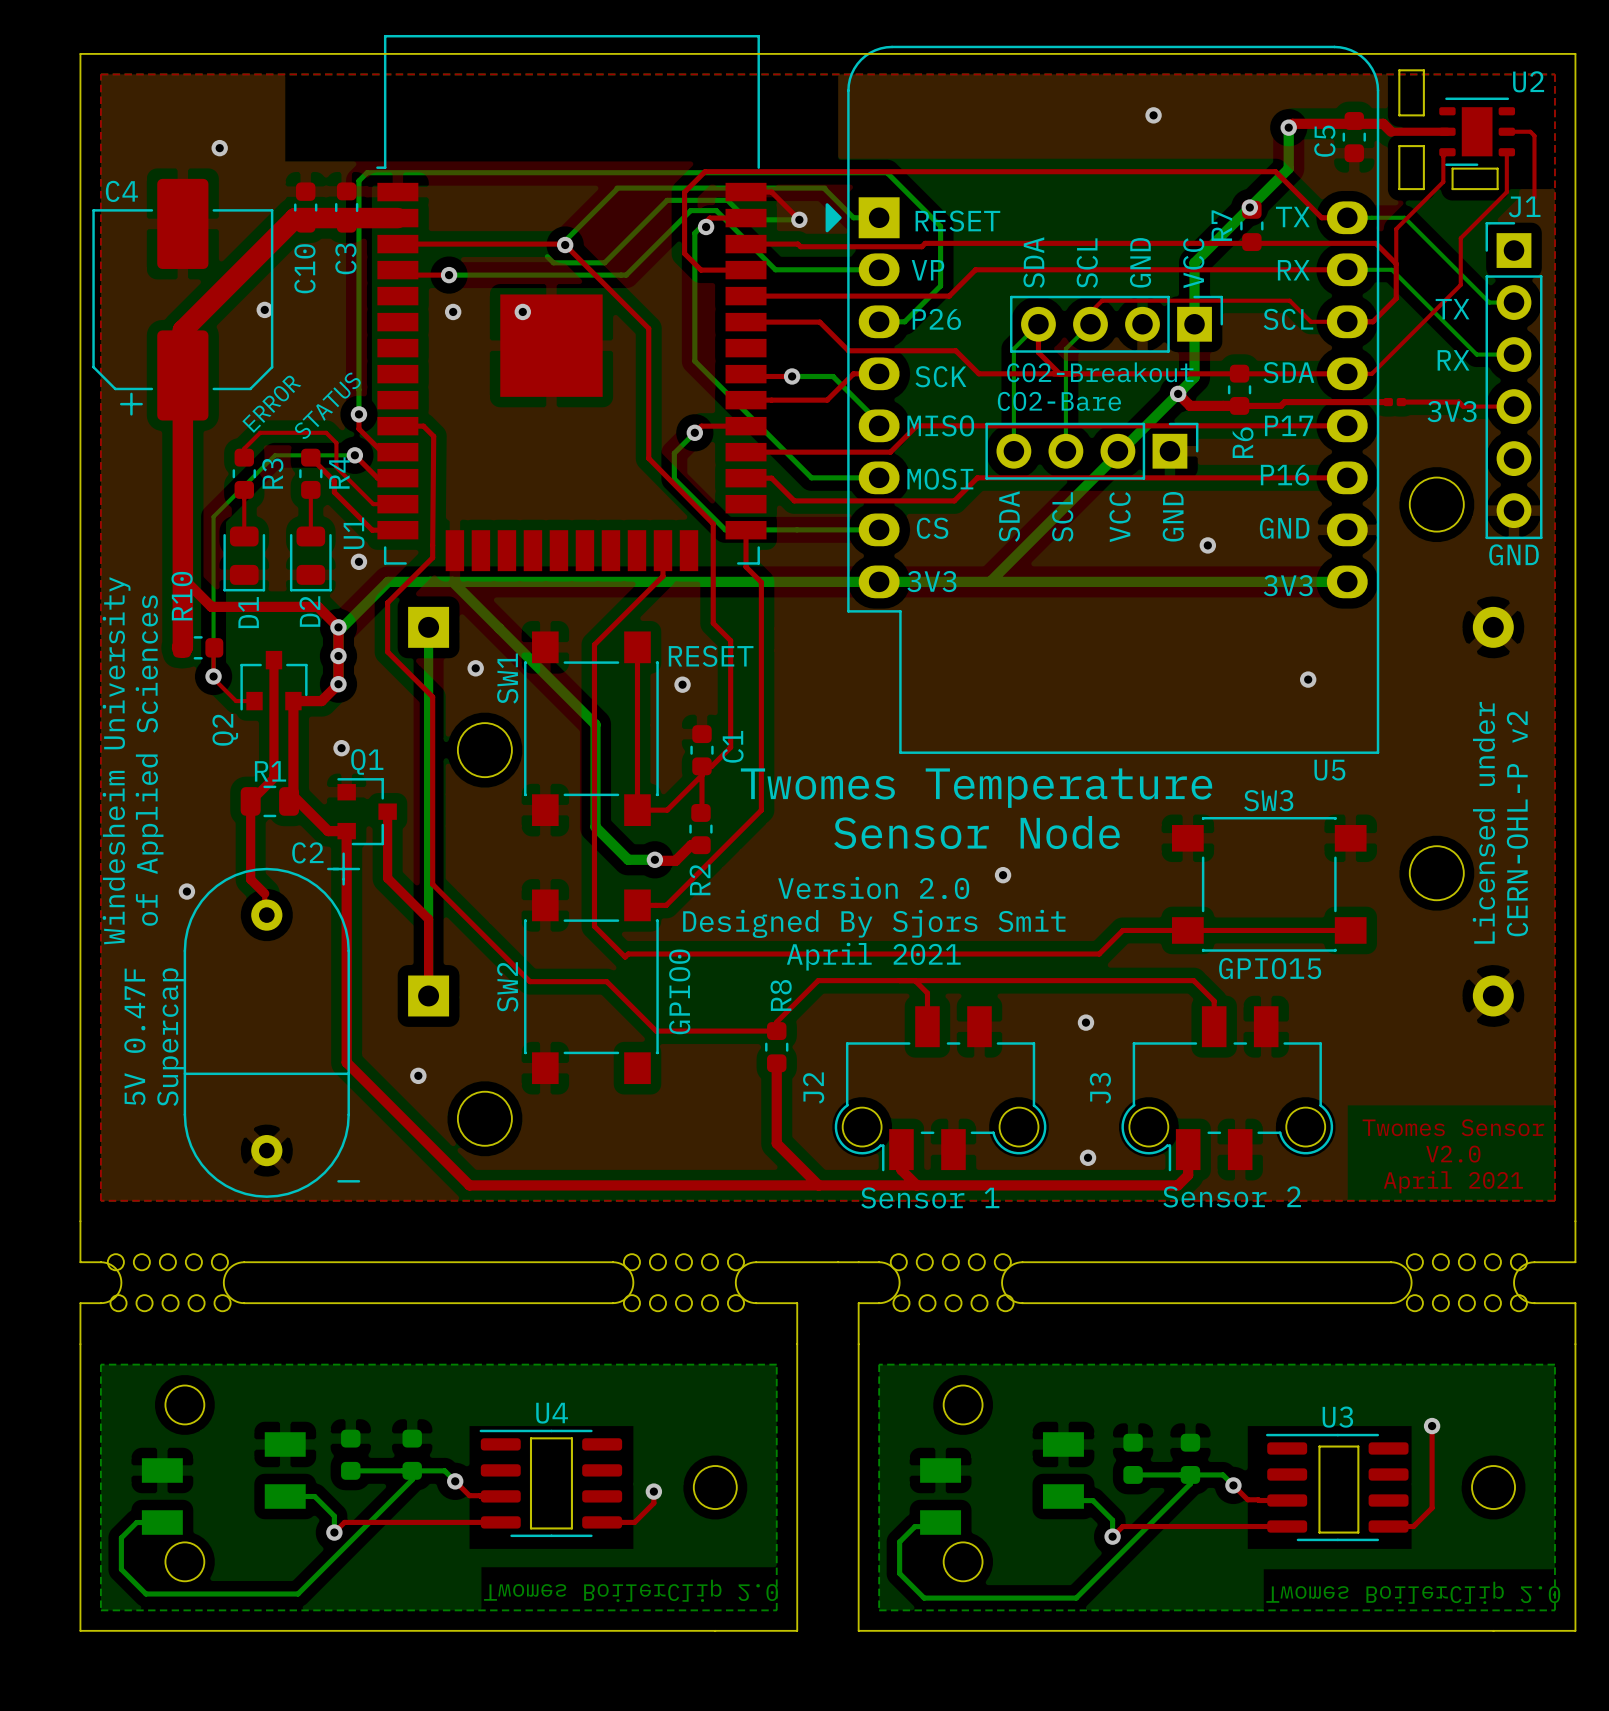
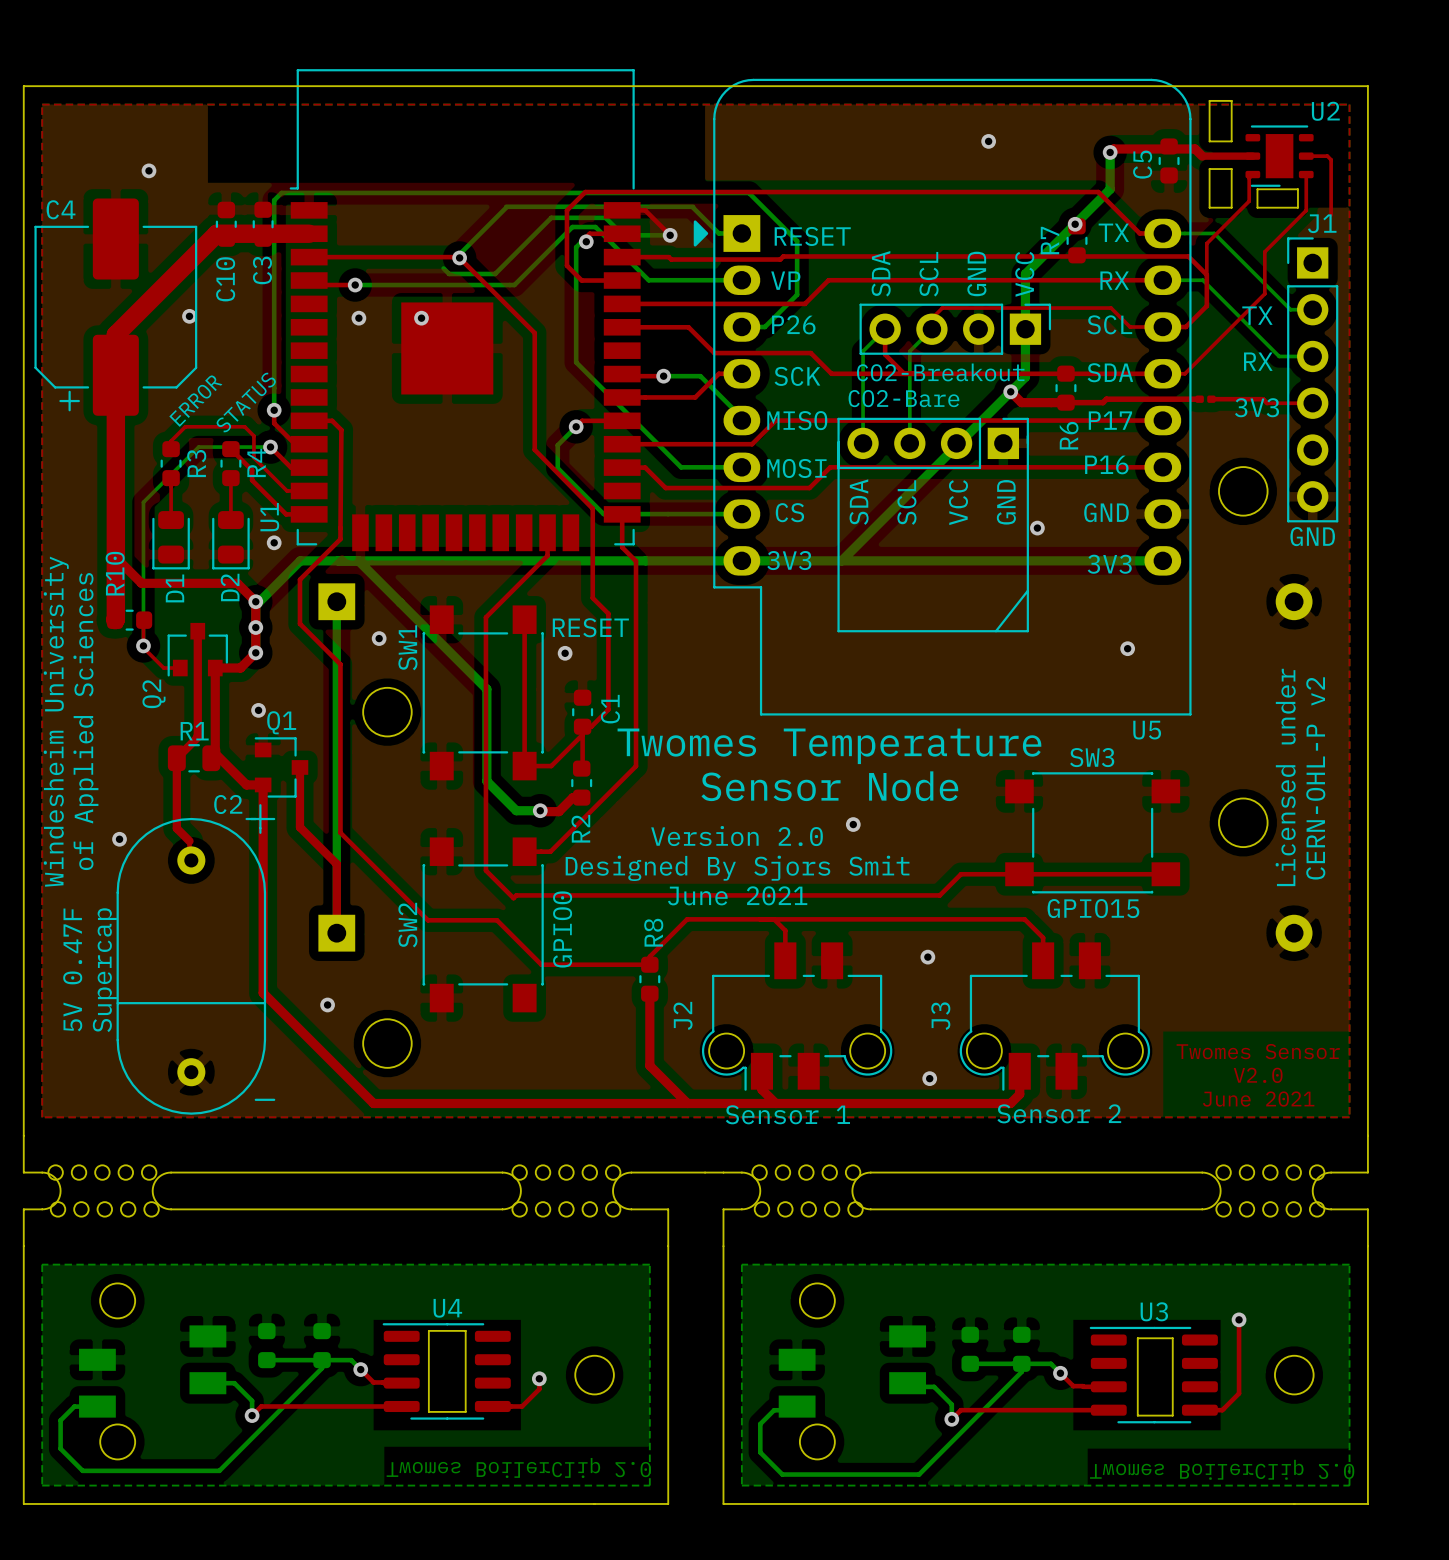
line: none -> (1027, 436) (1027, 631) (838, 631) (838, 442)
line: none -> (1027, 591) (995, 631)
text: April 2021 (873, 956) -> June 2021 (737, 895)
text: April 2021 (1453, 1182) -> June 2021 (1258, 1099)

